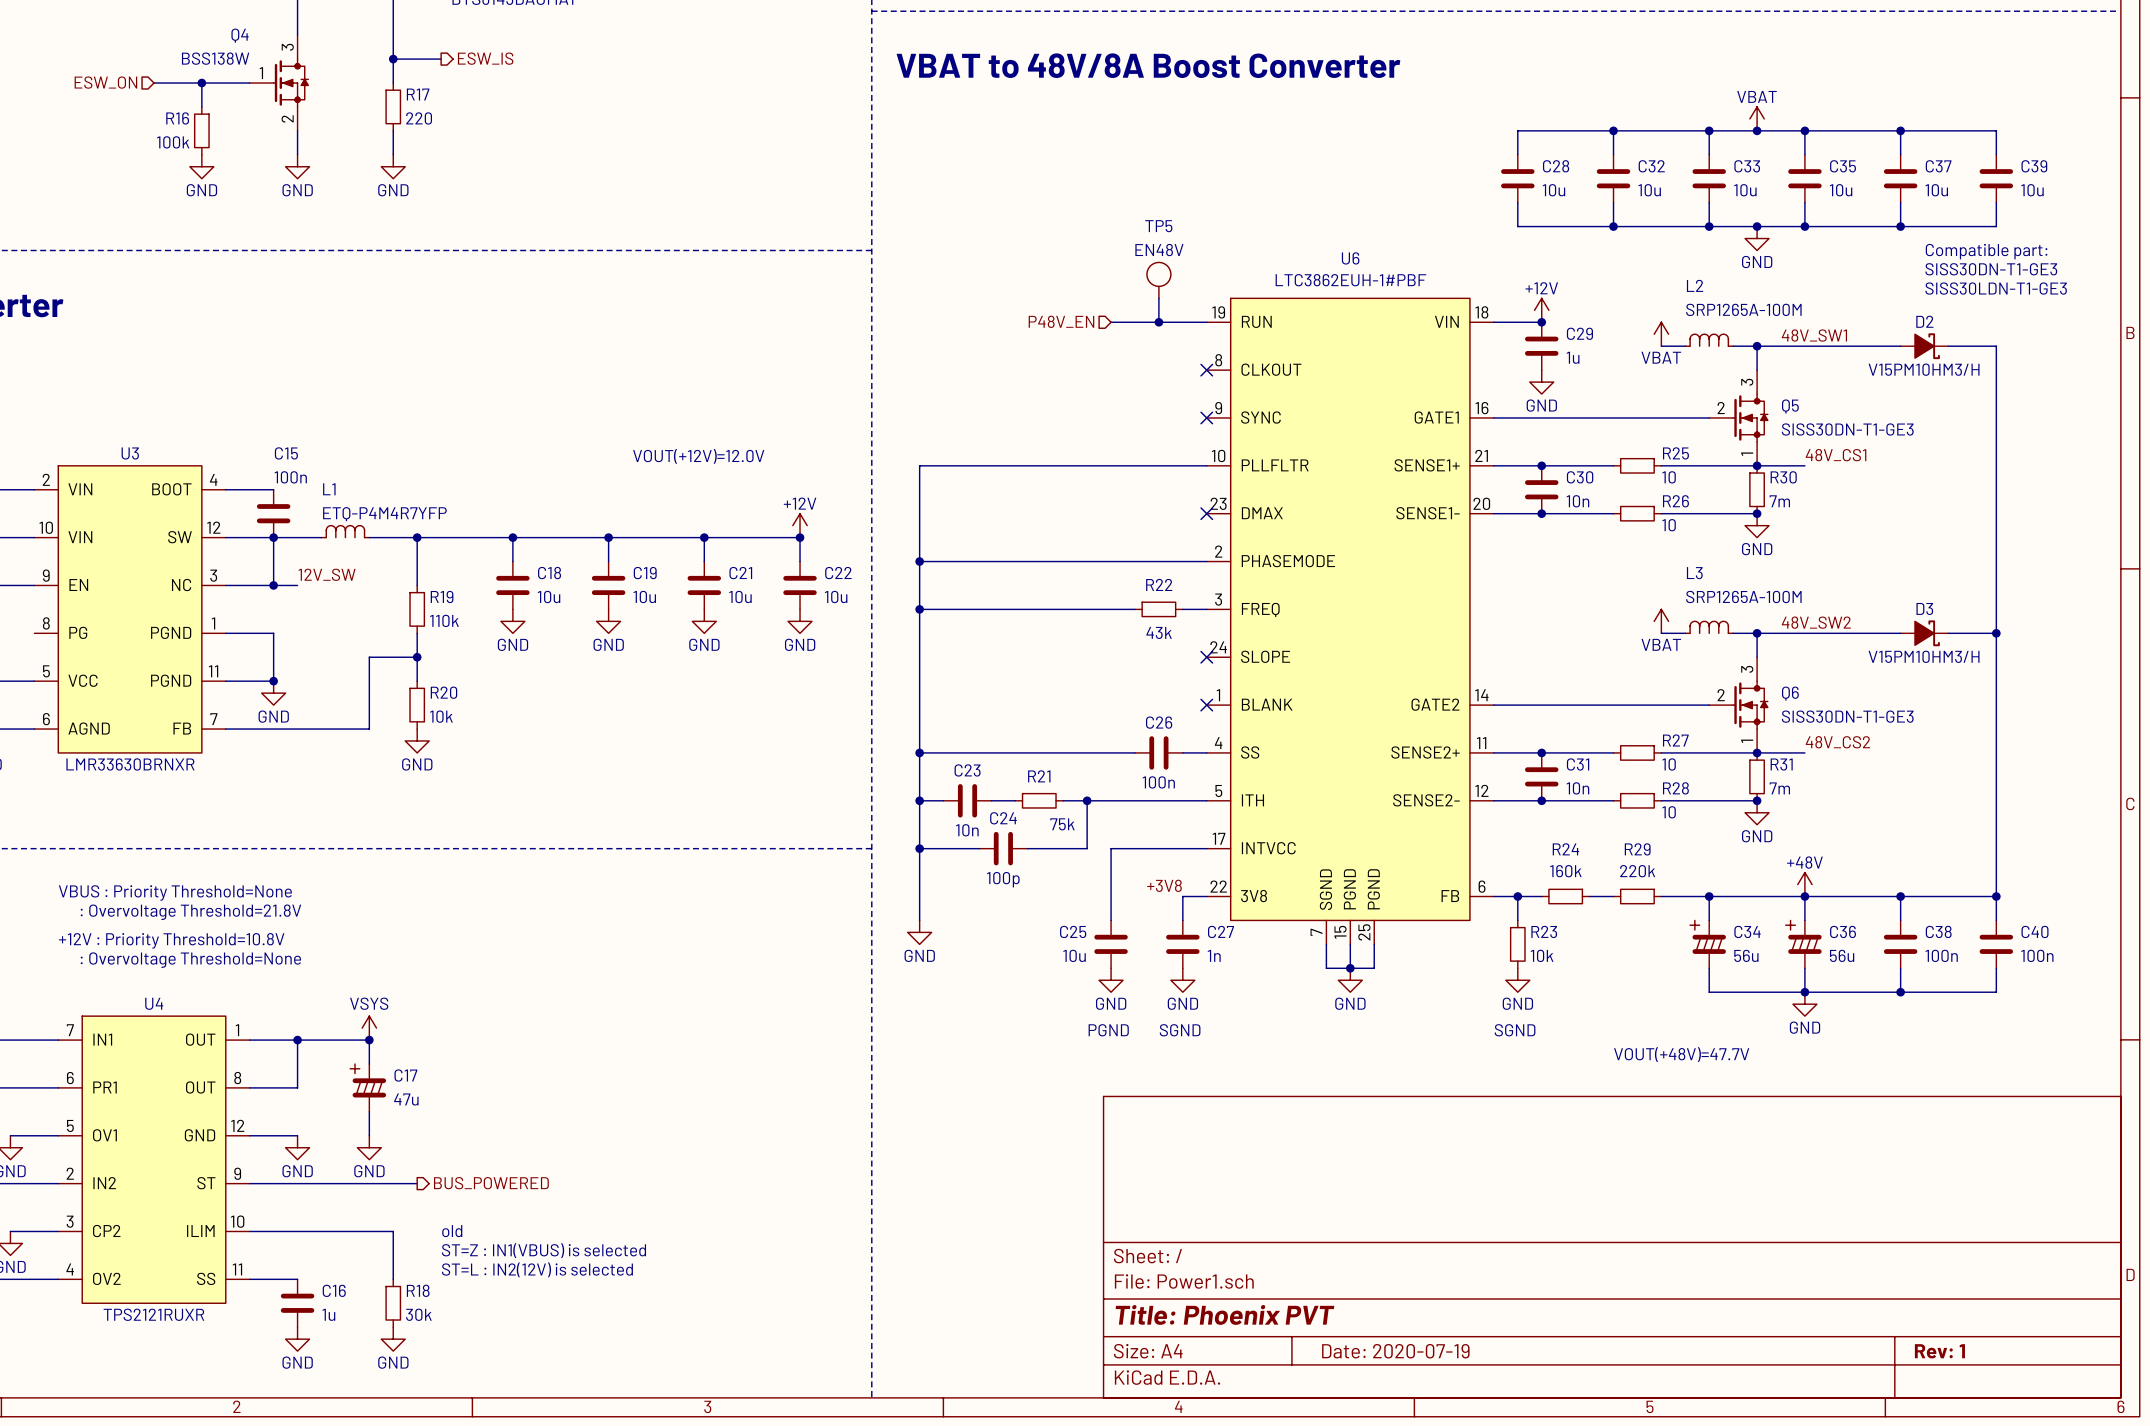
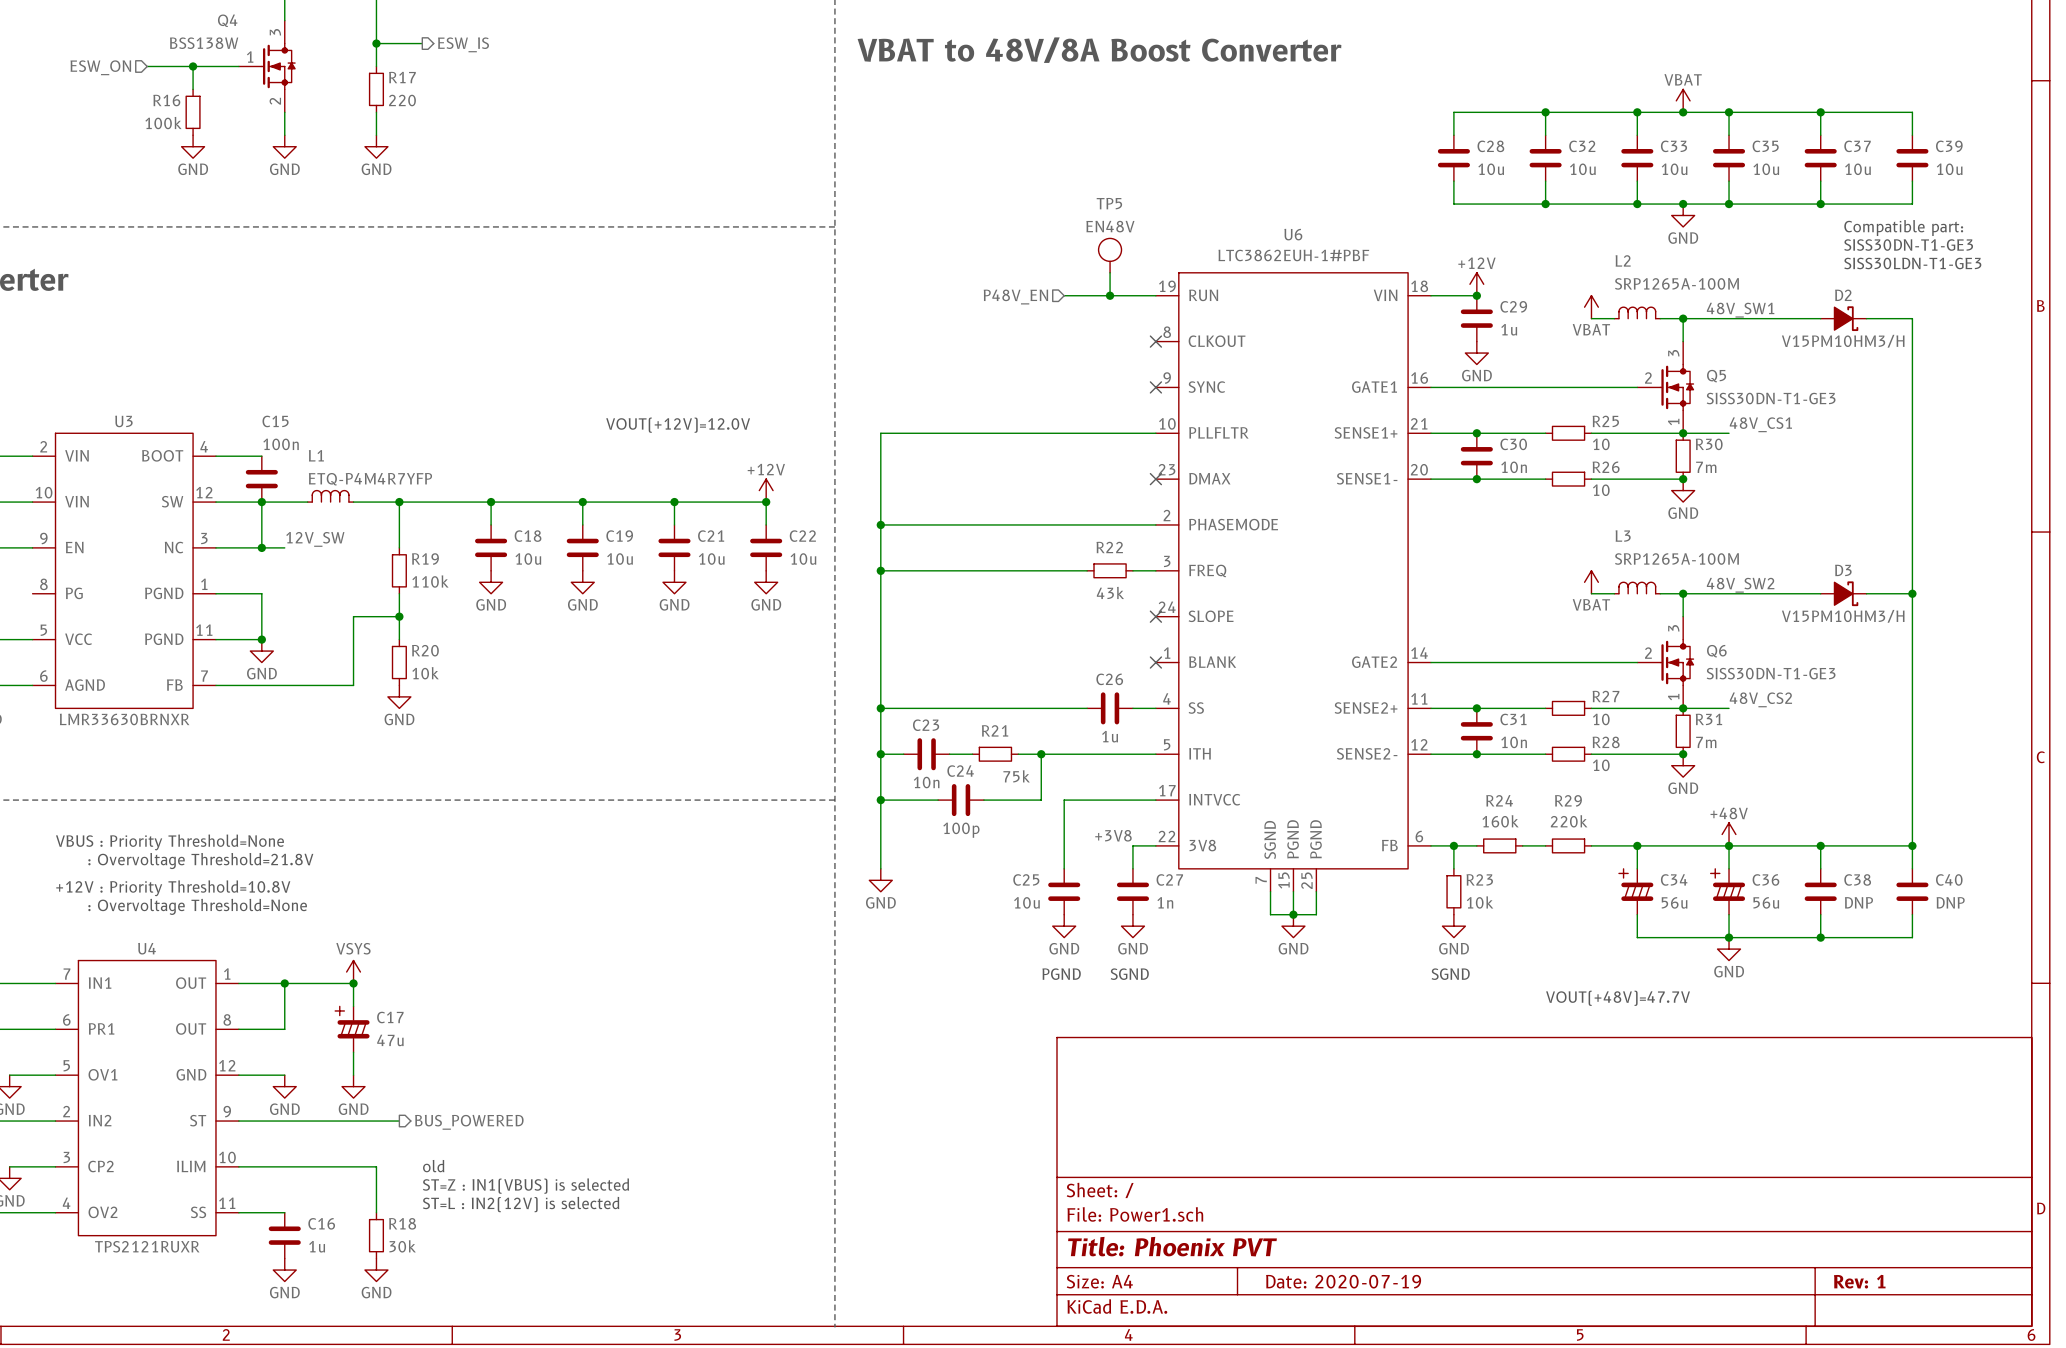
C26 value: 100n (1158, 782) -> 1u (1110, 736)
C38 value: 100n (1941, 955) -> DNP (1858, 902)
C40 value: 100n (2037, 955) -> DNP (1950, 902)

